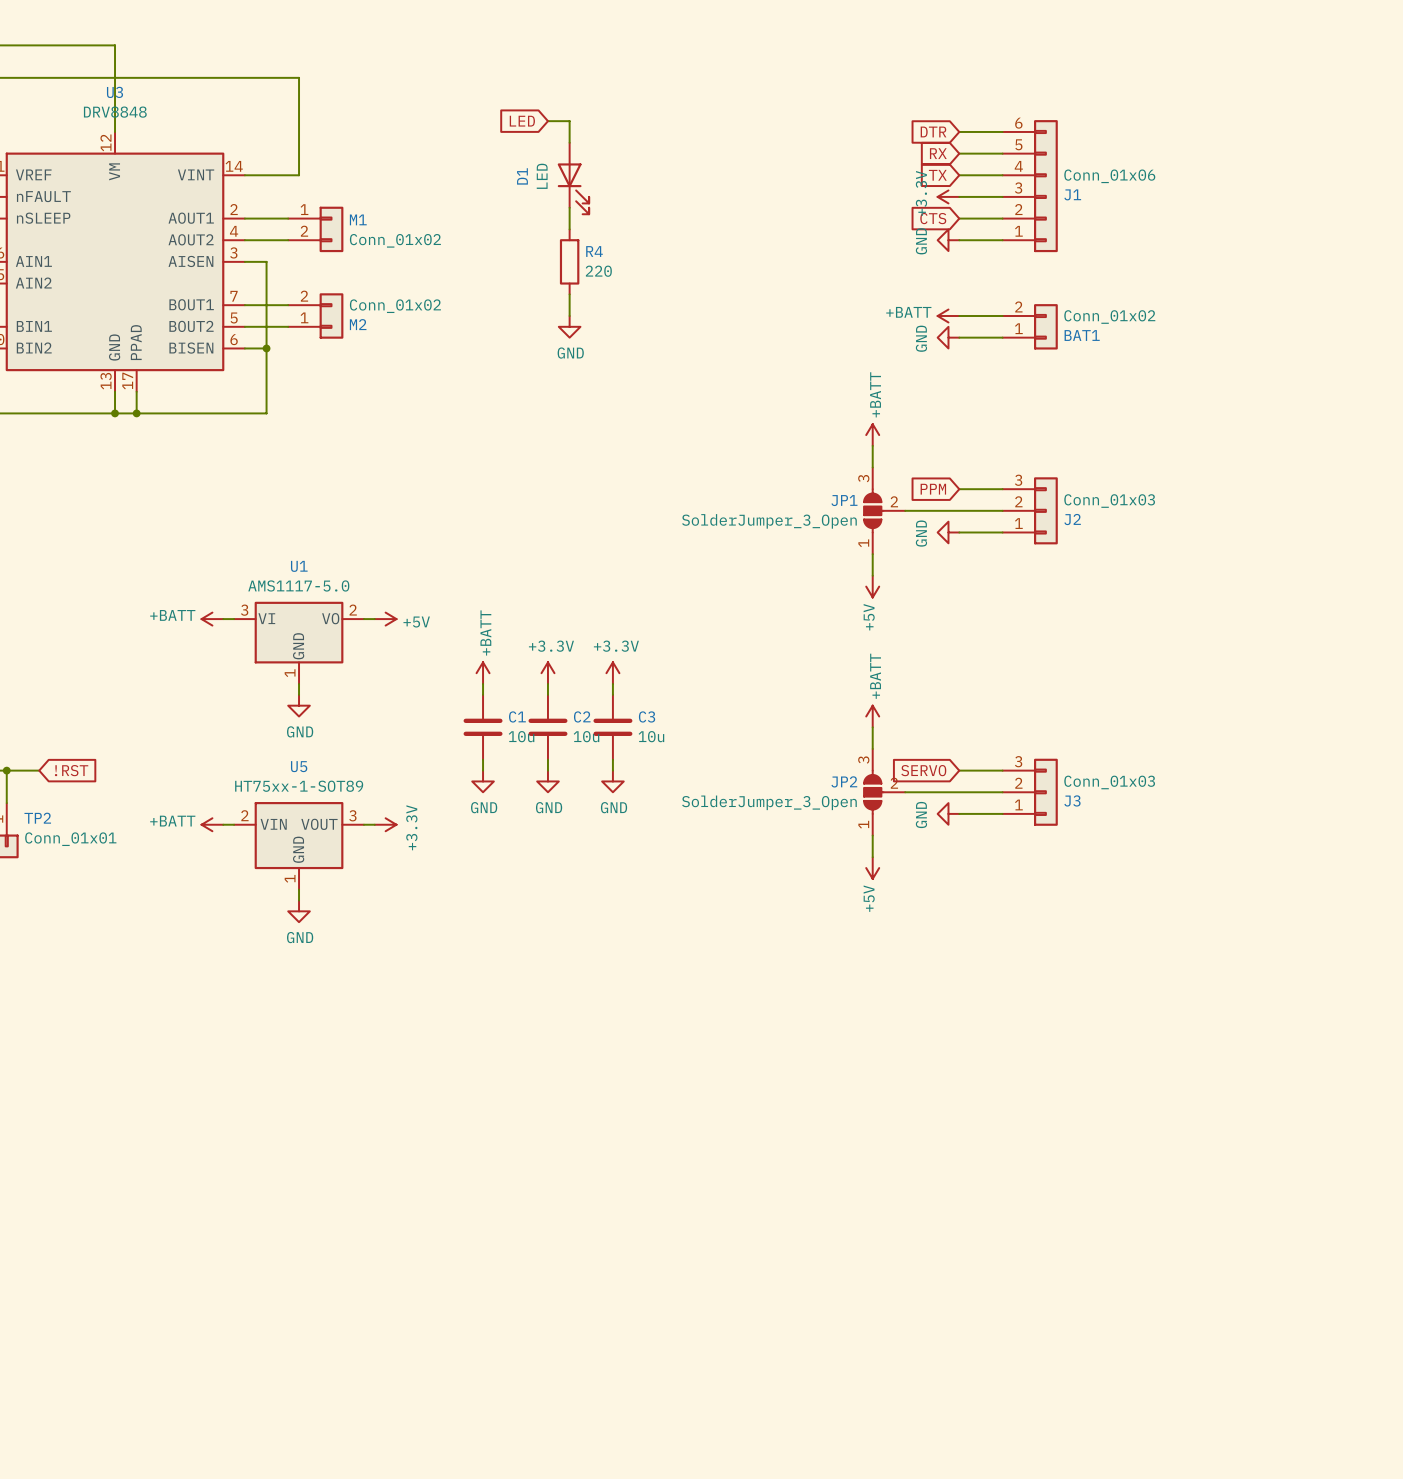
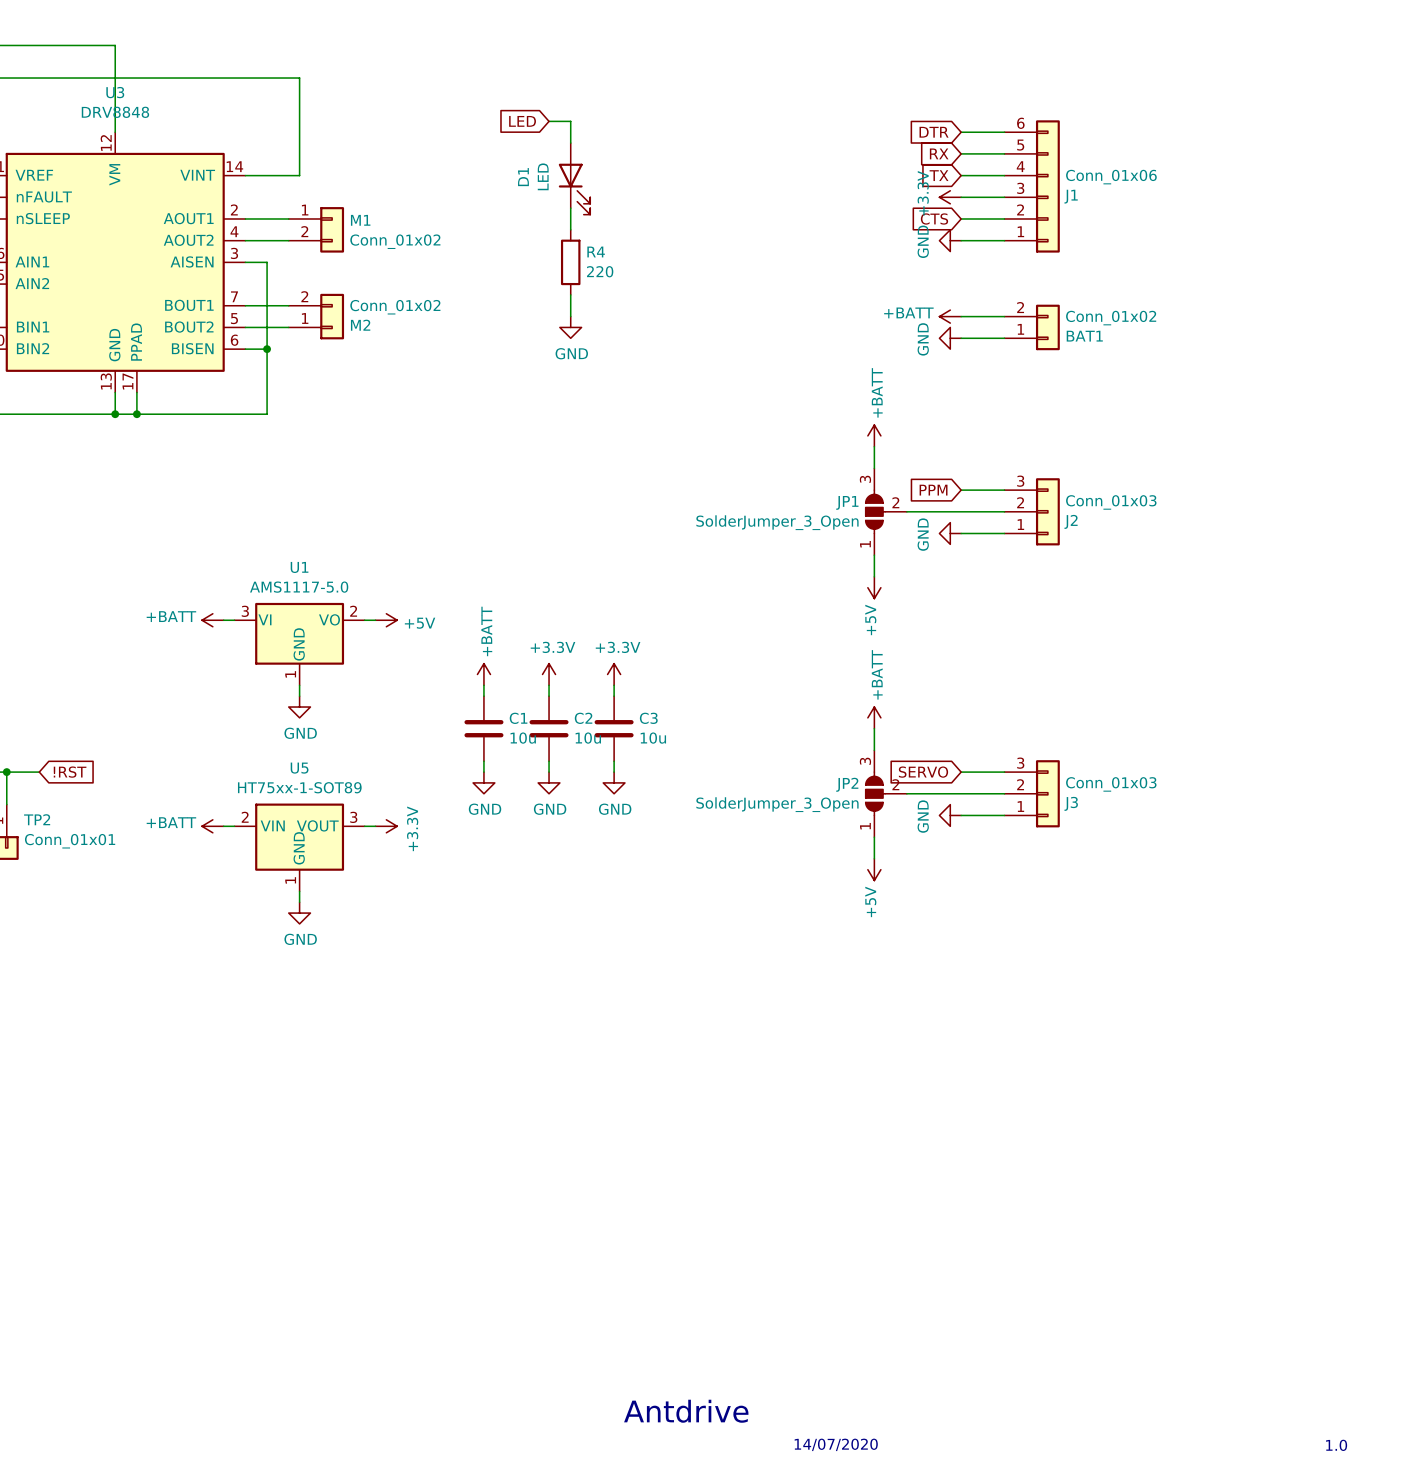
text: none -> Antdrive (686, 1411)
text: none -> 14/07/2020 (836, 1444)
text: none -> 1.0 (1336, 1445)

